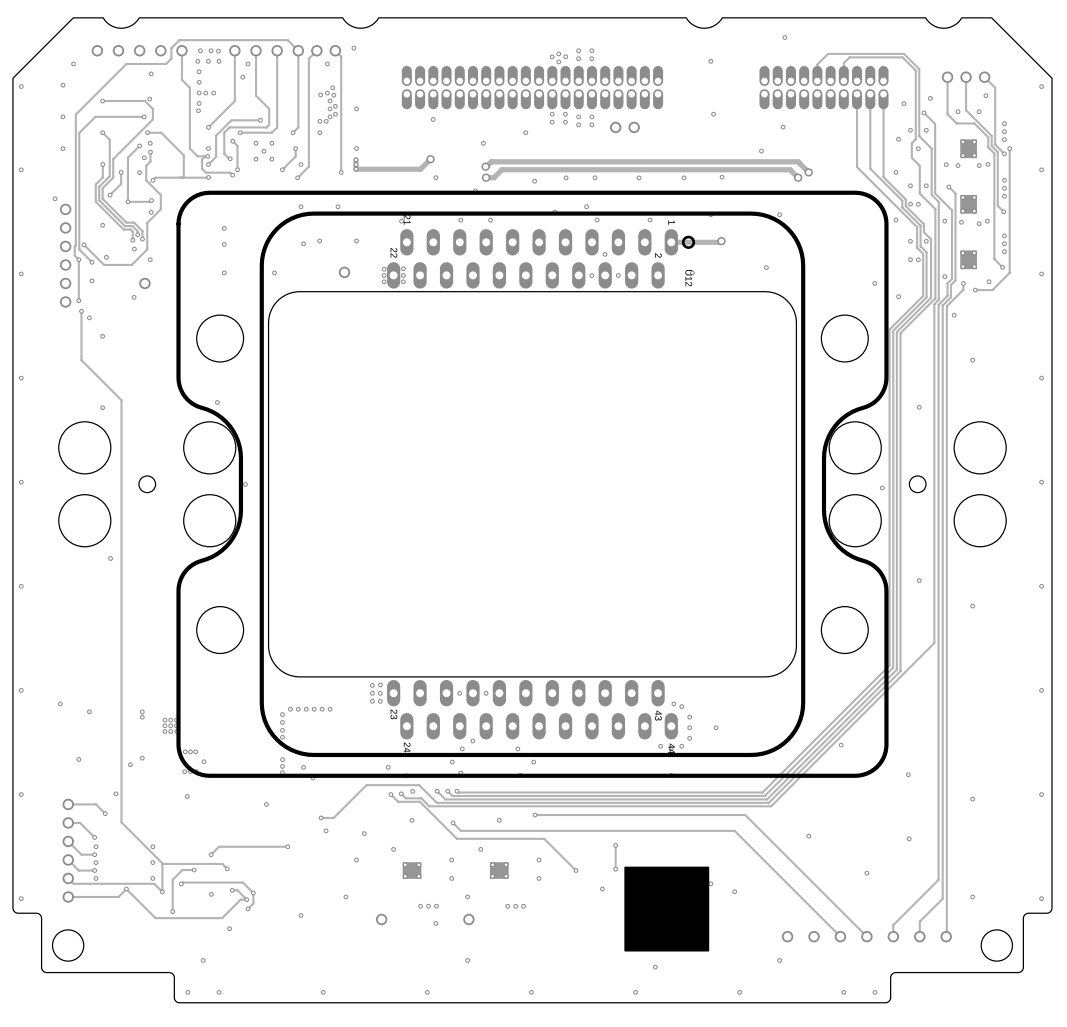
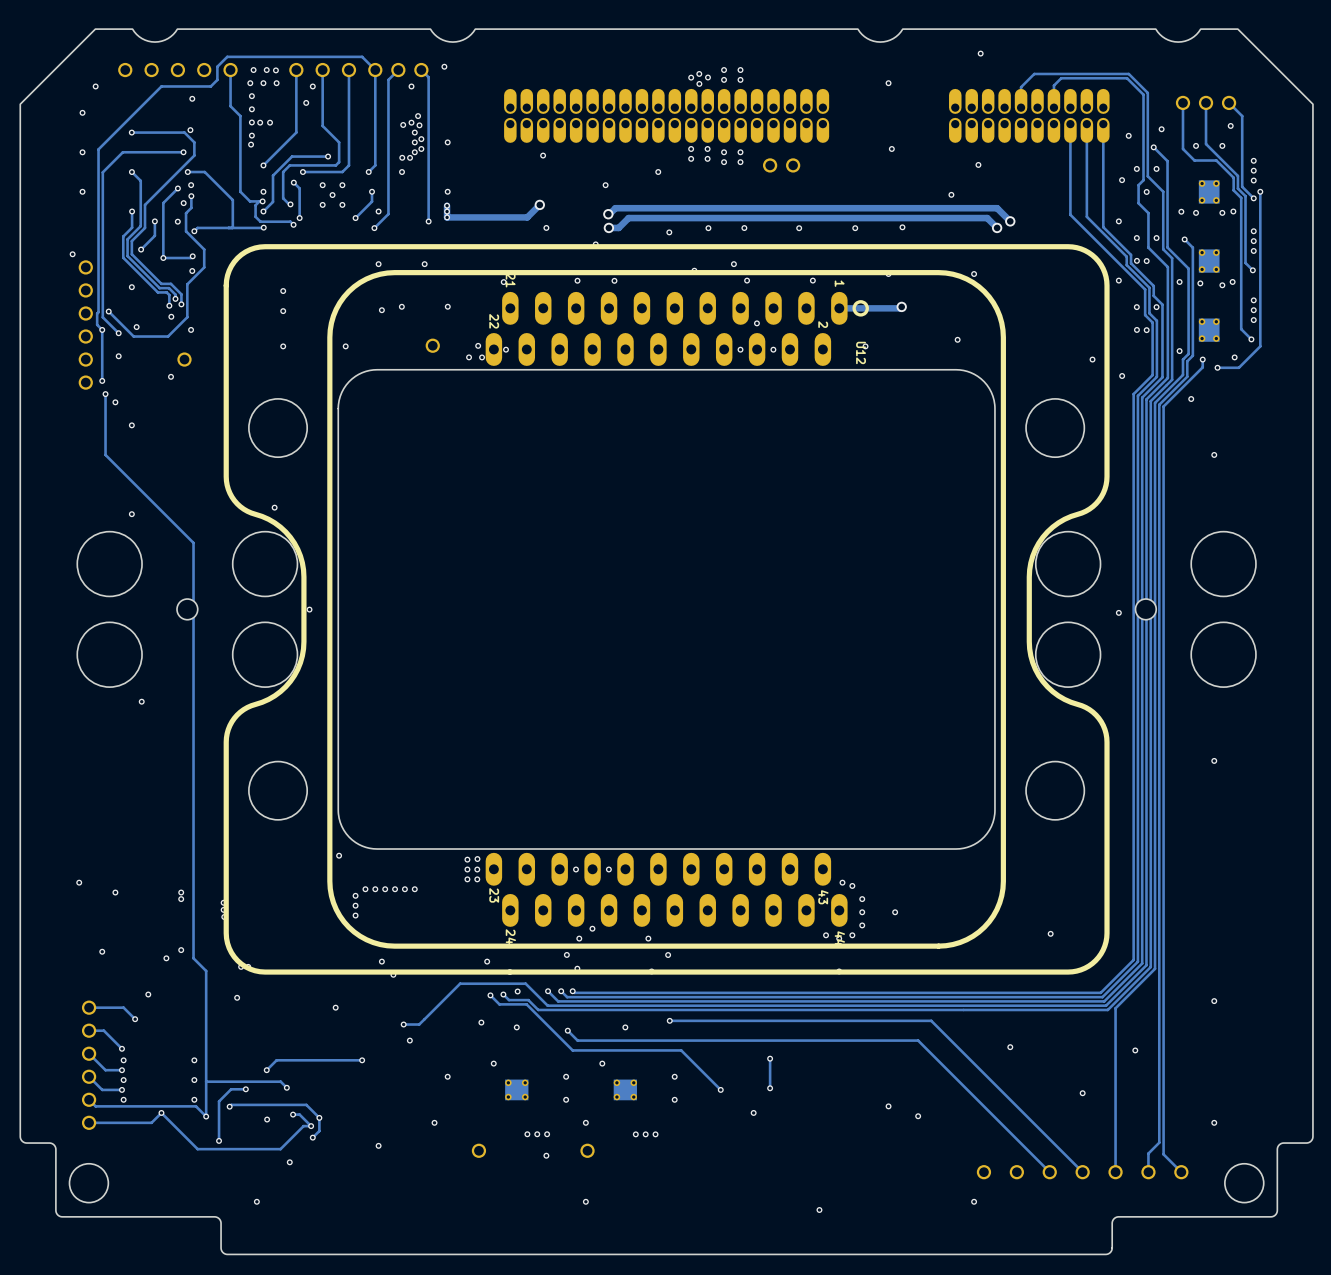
via: (21, 86) -> none
via: (1041, 86) -> none
via: (21, 169) -> none
via: (1041, 169) -> none
via: (403, 268) -> none
via: (384, 269) -> none
via: none -> (478, 345)
via: (21, 273) -> none
via: (1041, 273) -> none
via: (384, 275) -> none
via: none -> (469, 357)
via: (403, 281) -> none
track: (934, 304) (934, 643) (771, 806) -> (1166, 385) (1150, 401) (1150, 967) (1107, 1009) (963, 1009)
track: (938, 304) (938, 879) (893, 925) -> (1171, 386) (1155, 402) (1155, 968) (1115, 1008) (1115, 1157)
track: (942, 305) (942, 898) (928, 912) -> (1176, 387) (1159, 404) (1159, 1142)
track: (946, 306) (946, 936) -> (1182, 387) (1163, 406) (1163, 1154) (1181, 1172)
track: (907, 311) (889, 329) (889, 665) (762, 792) -> (1133, 394) (1133, 959) (1100, 992) (952, 992)
track: (911, 312) (893, 330) (893, 667) (764, 795) -> (1137, 395) (1137, 961) (1102, 997) (955, 997)
track: (914, 314) (896, 331) (896, 669) (767, 799) -> (1142, 397) (1142, 963) (1104, 1001) (958, 1001)
track: (918, 315) (900, 333) (900, 671) (768, 802) -> (1146, 399) (1146, 965) (1106, 1005) (960, 1005)
via: (21, 378) -> none
via: (1041, 378) -> none
track: (121, 400) (121, 822) (162, 863) -> (155, 504) (193, 542) (193, 958) (206, 970) (206, 1080)
via: (919, 407) -> none
via: (21, 482) -> none
via: (1041, 482) -> none
via position: (882, 487) -> (1118, 612)
via: (919, 580) -> none
via: (21, 586) -> none
via: (1041, 586) -> none
via: none -> (339, 855)
via: (21, 690) -> none
via: (1041, 690) -> none
via: (164, 720) -> none
via: (170, 720) -> none
via: (164, 725) -> none
via: (170, 725) -> none
via: (164, 731) -> none
via: (170, 731) -> none
via: (282, 737) -> none
via: (185, 751) -> none
via: (190, 751) -> none
via: (195, 751) -> none
via: (282, 759) -> none
via: (204, 761) -> none
via: (282, 766) -> none
via: (184, 771) -> none
via: (282, 772) -> none
via: (908, 774) -> none
via: (21, 794) -> none
via: (1041, 794) -> none
via position: (364, 833) -> (481, 1022)
drawing: [624, 866, 710, 952] -> none
via: (21, 898) -> none
via: (1041, 898) -> none
via: (187, 992) -> none
via: (219, 992) -> none
via: (323, 992) -> none
via: (427, 992) -> none
via: (531, 992) -> none
via: (635, 992) -> none
via: (739, 992) -> none
via: (843, 992) -> none
via: (875, 992) -> none

